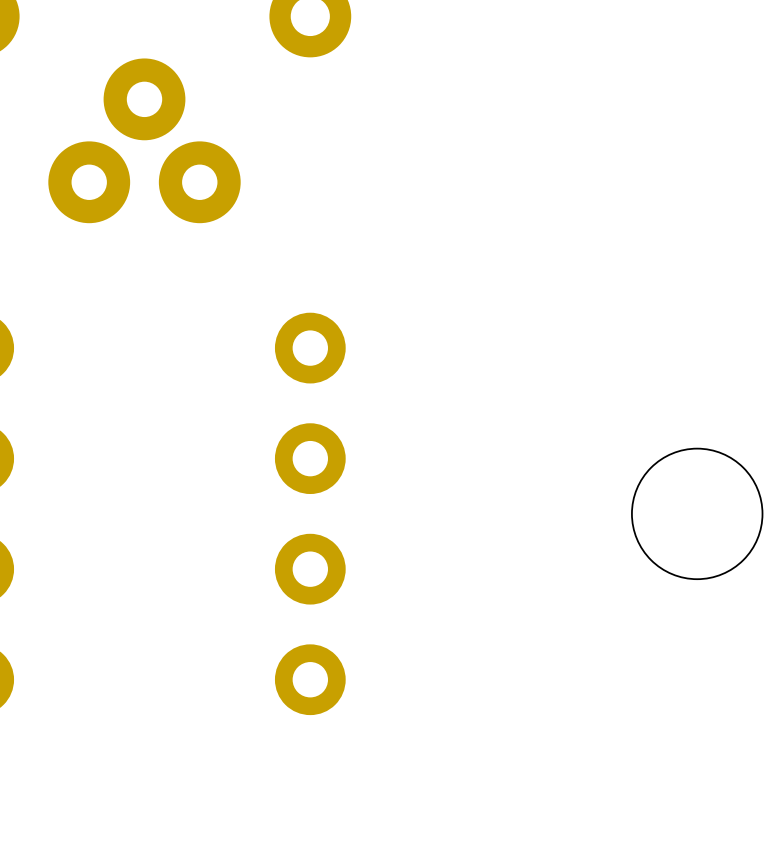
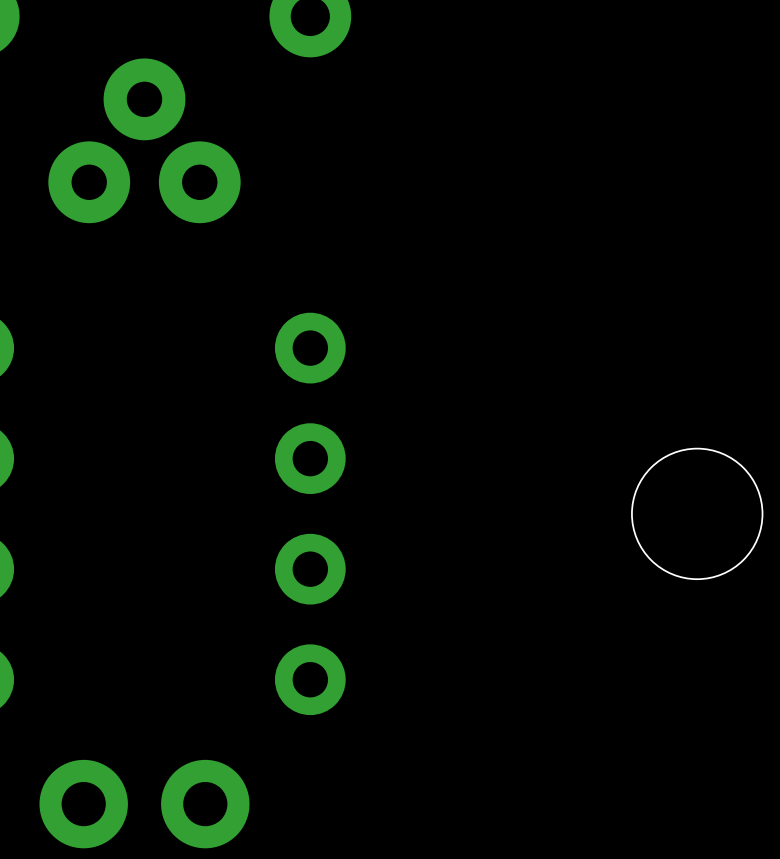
part: none -> (144, 804)

